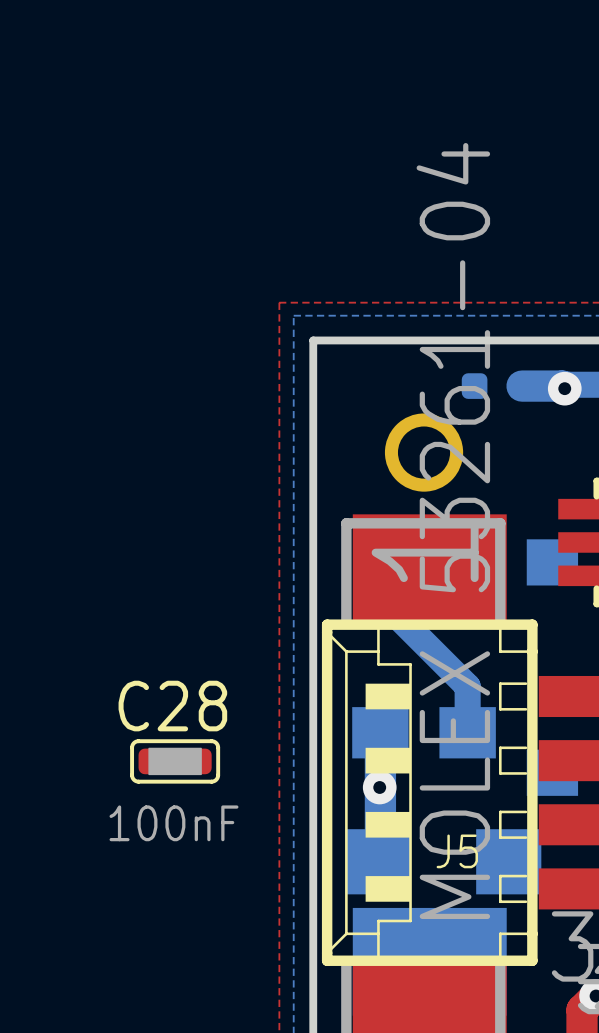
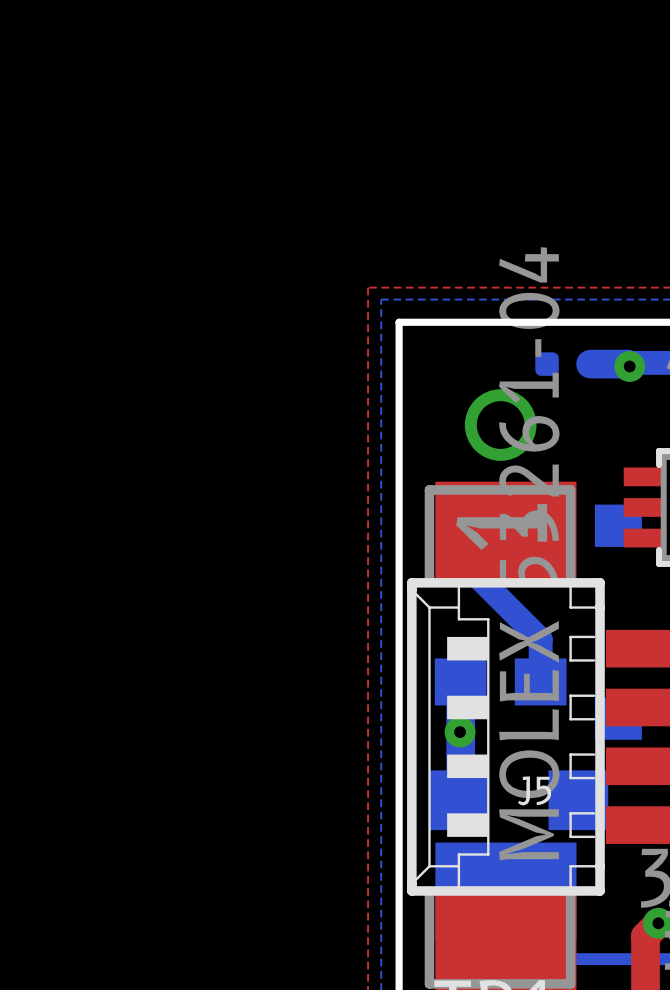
C28: 100nF (175, 761) -> none

